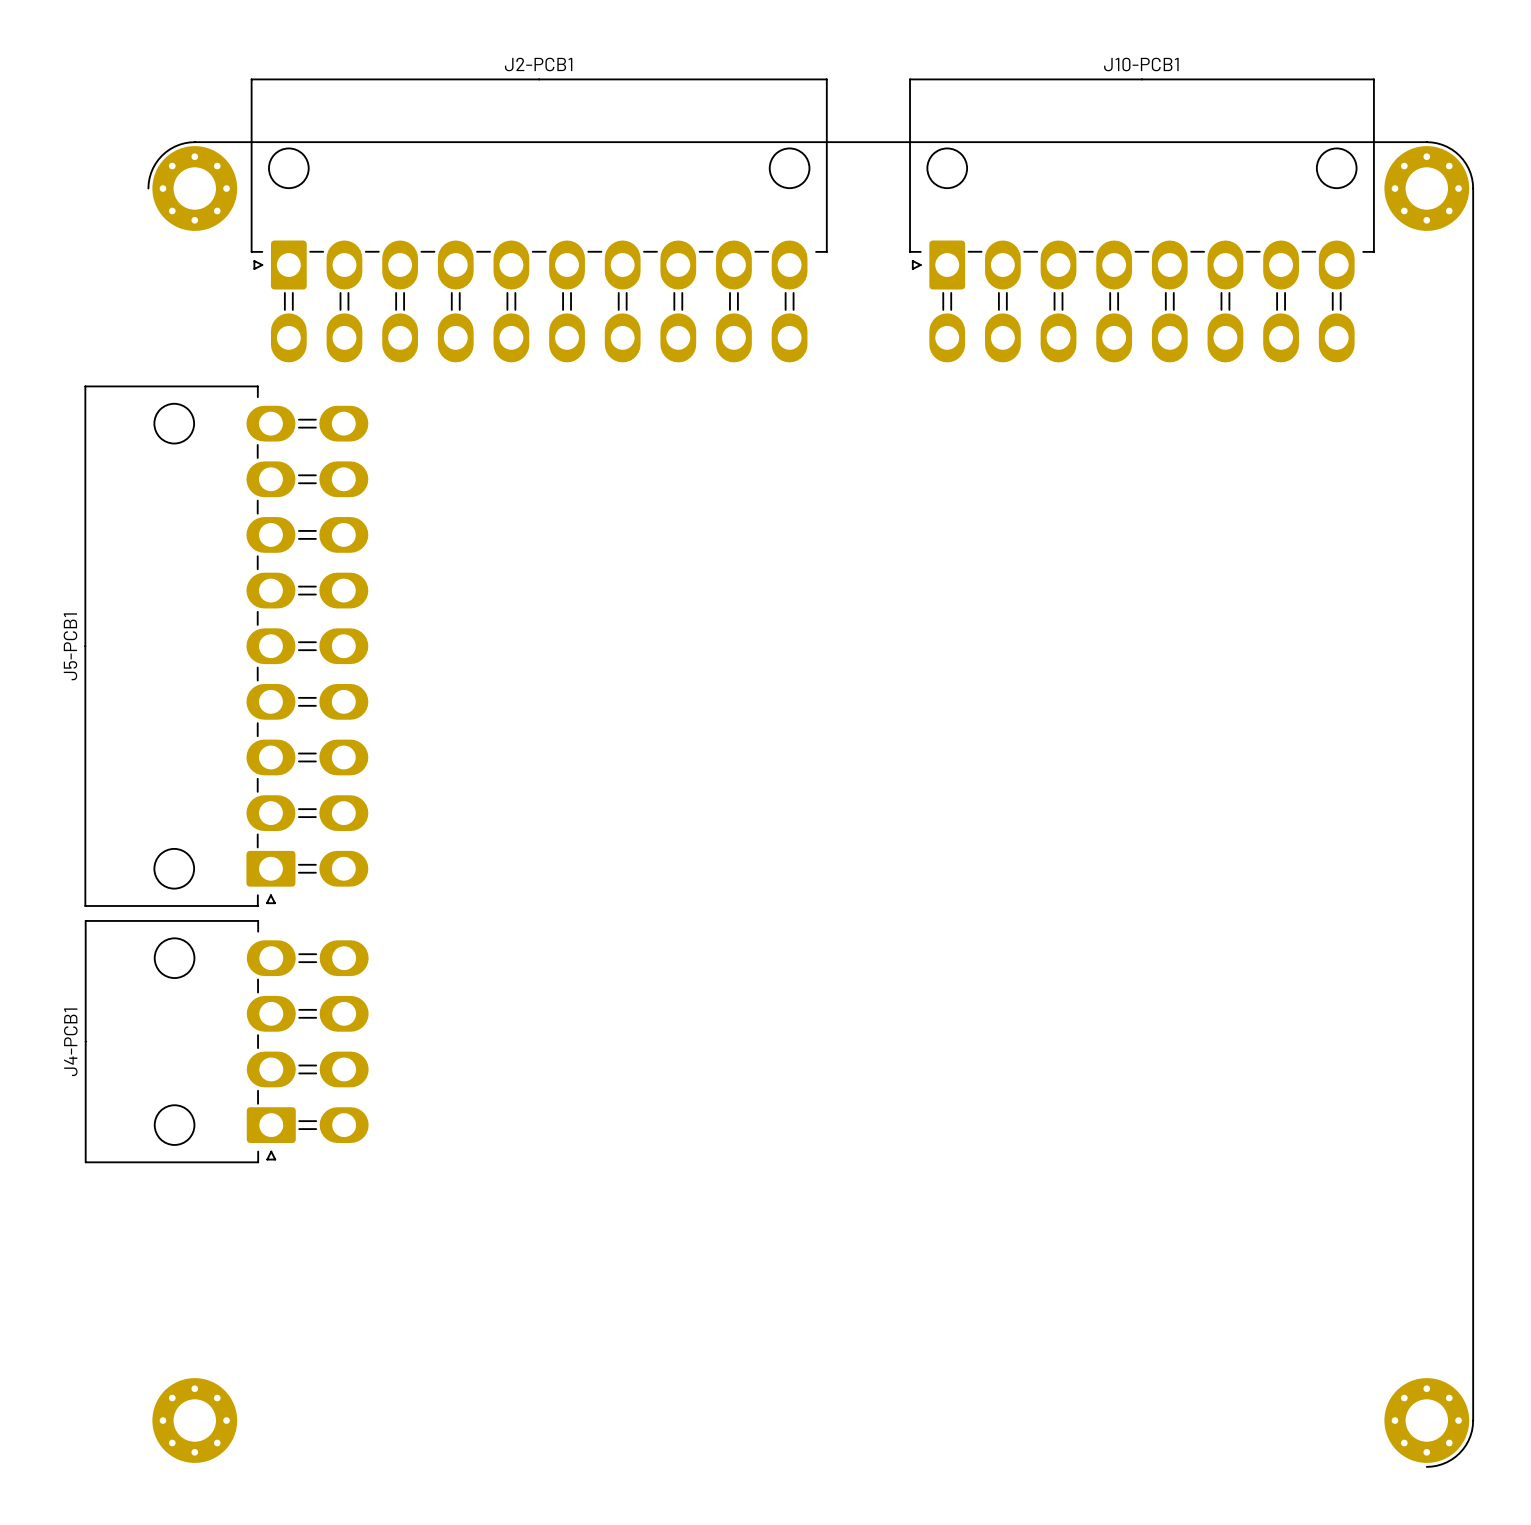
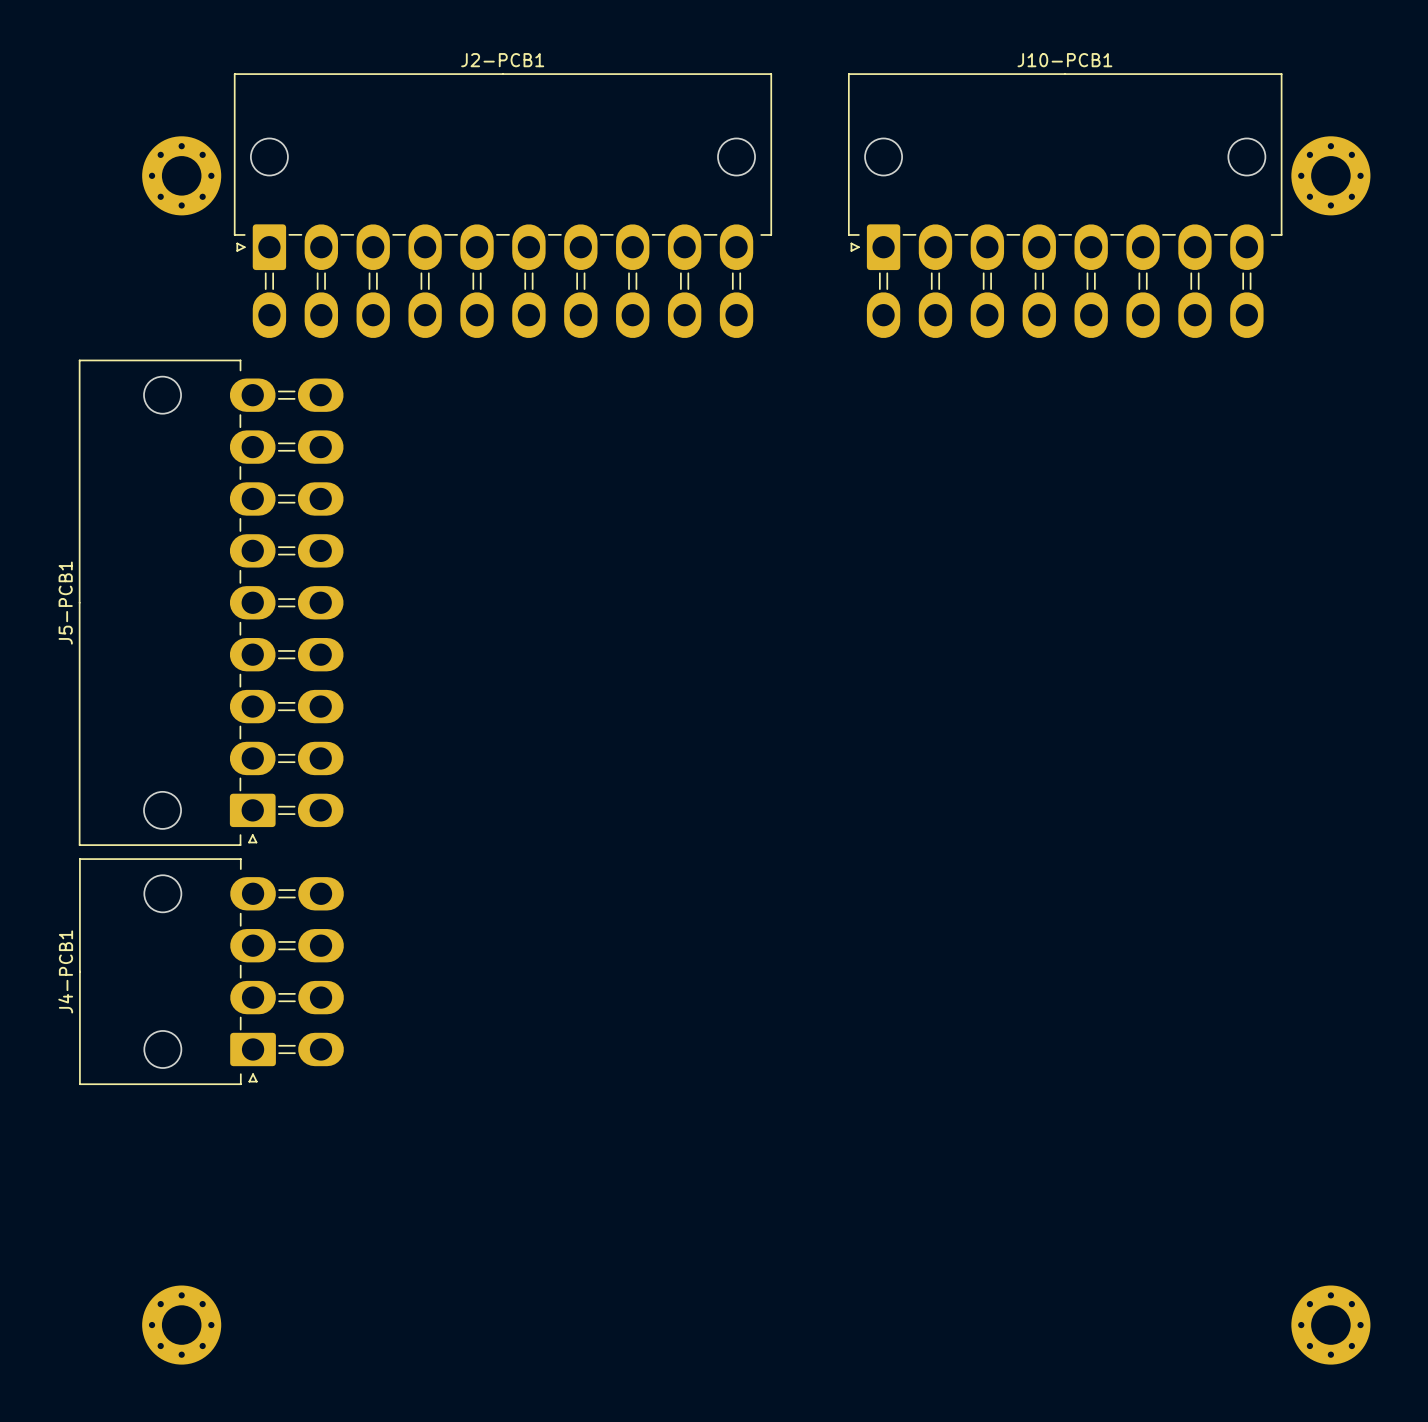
board edge: (148, 188) (153, 168) (161, 155) (174, 146) (194, 142) (1426, 142) (1442, 144) (1459, 155) (1470, 173) (1473, 188) (1473, 1420) (1468, 1440) (1459, 1453) (1442, 1464) (1426, 1466) -> none

